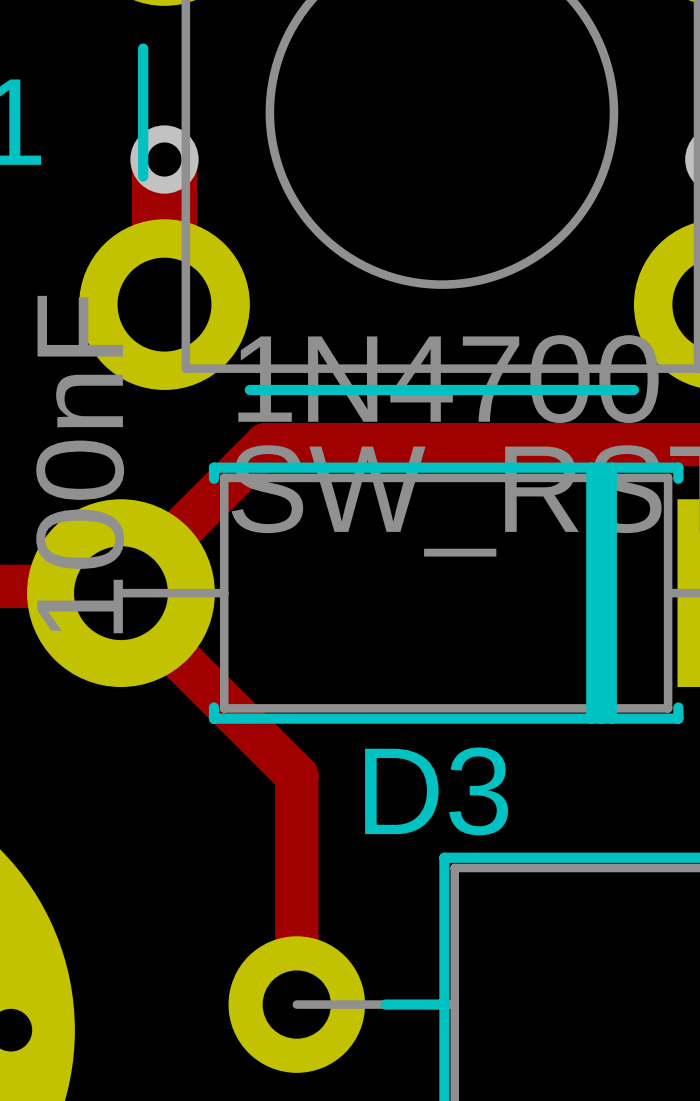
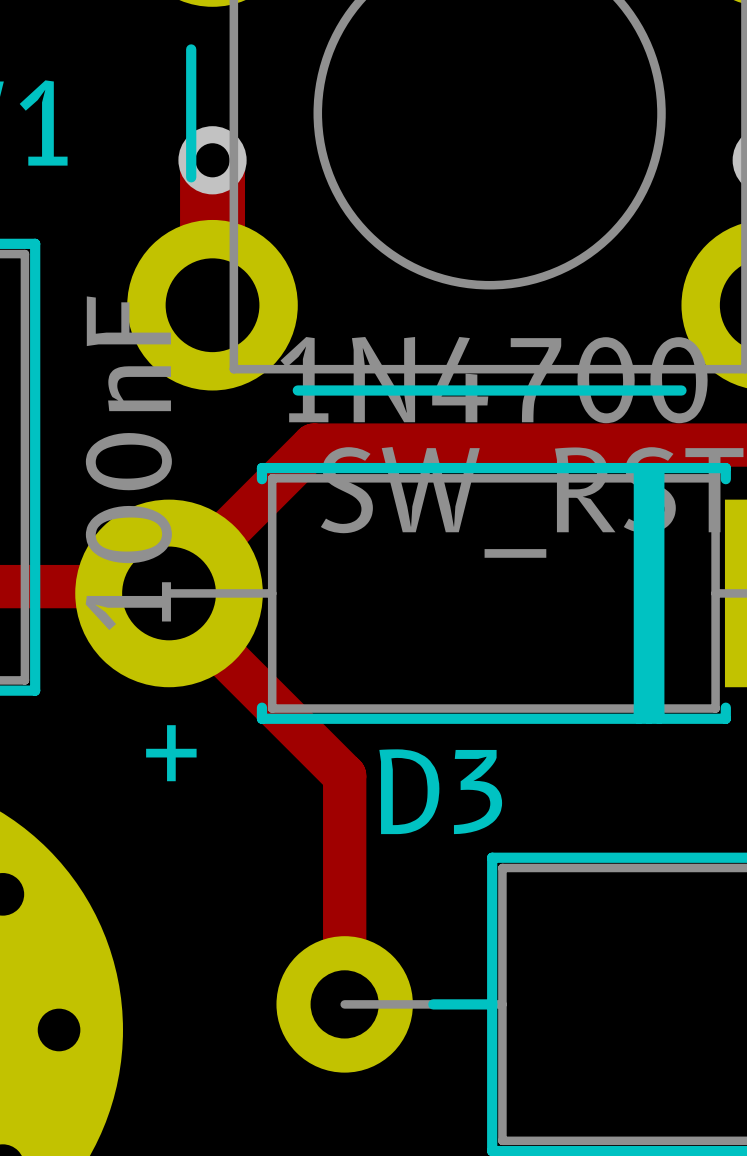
text: none -> + (171, 753)
D3 name position: D3 (436, 791) -> D3 (440, 791)

